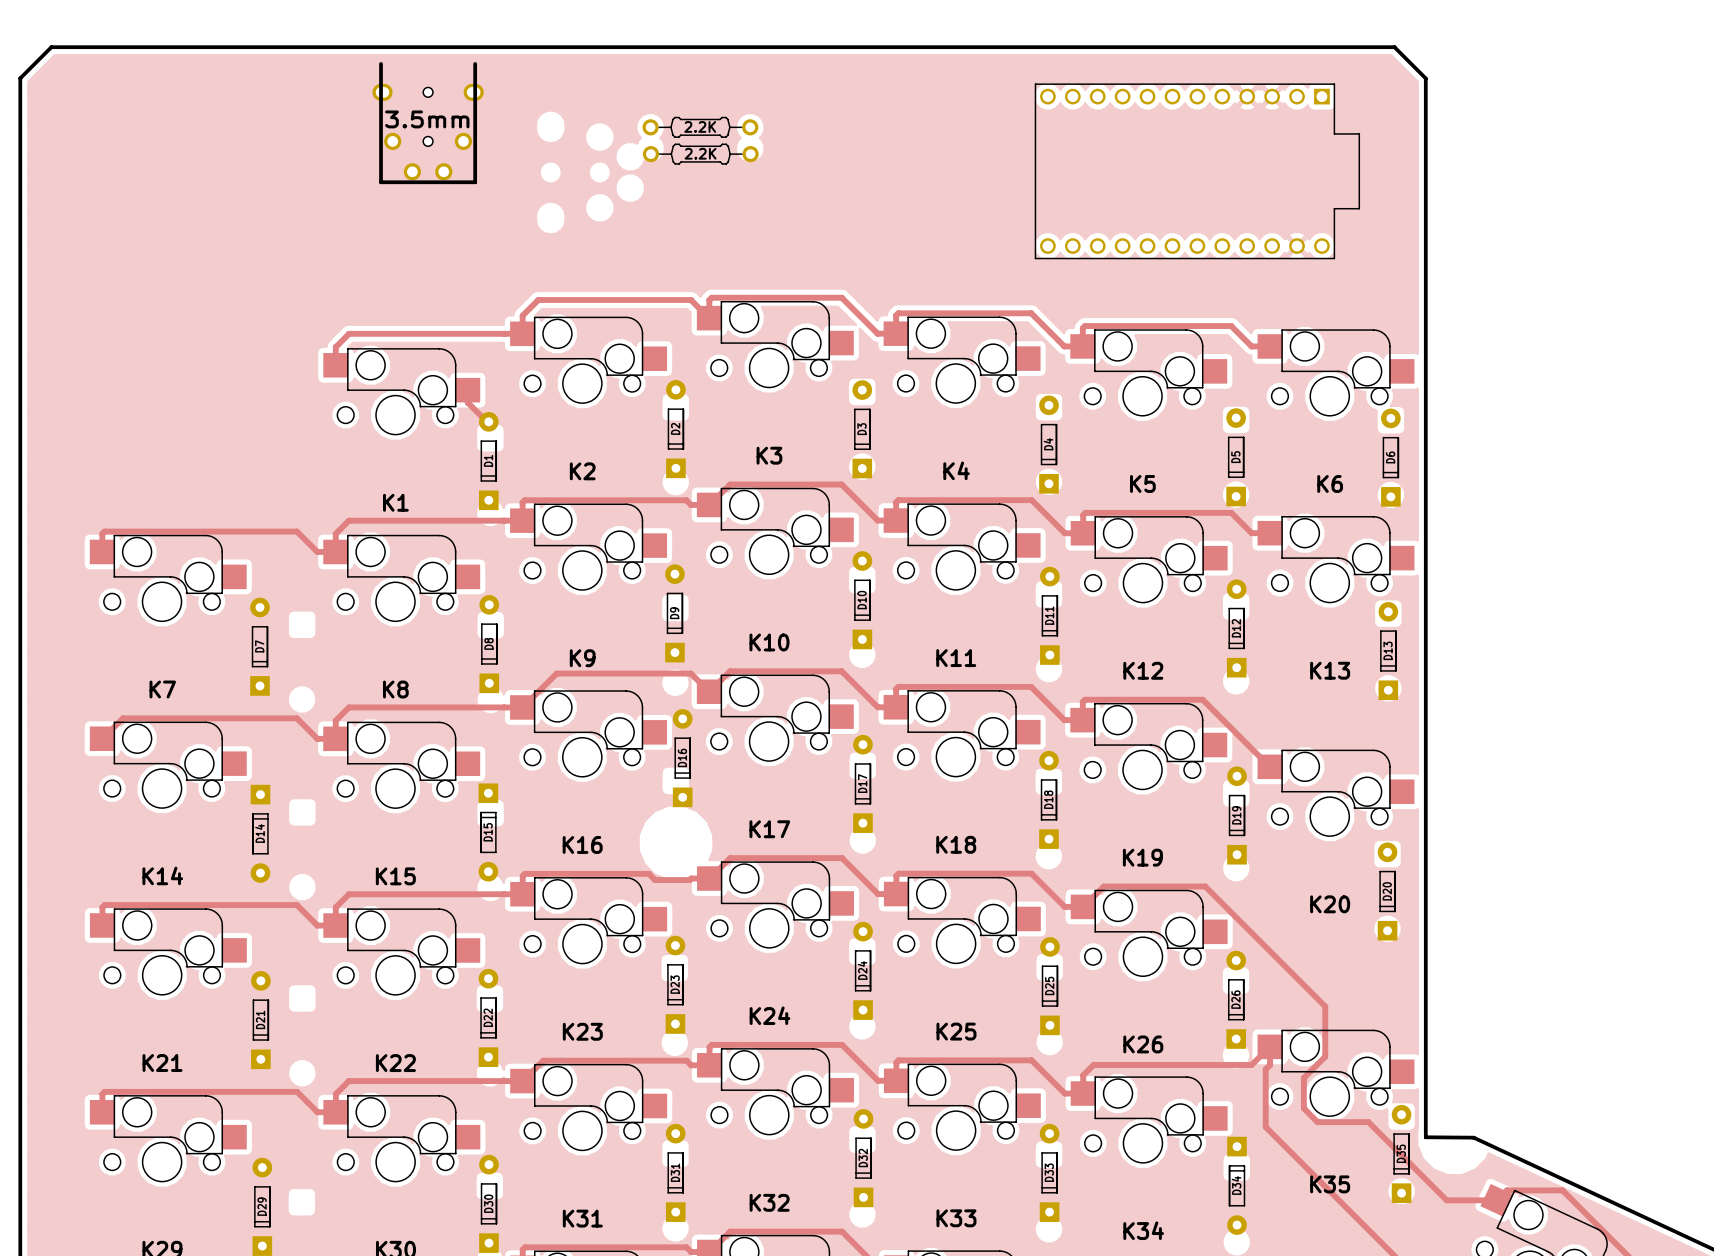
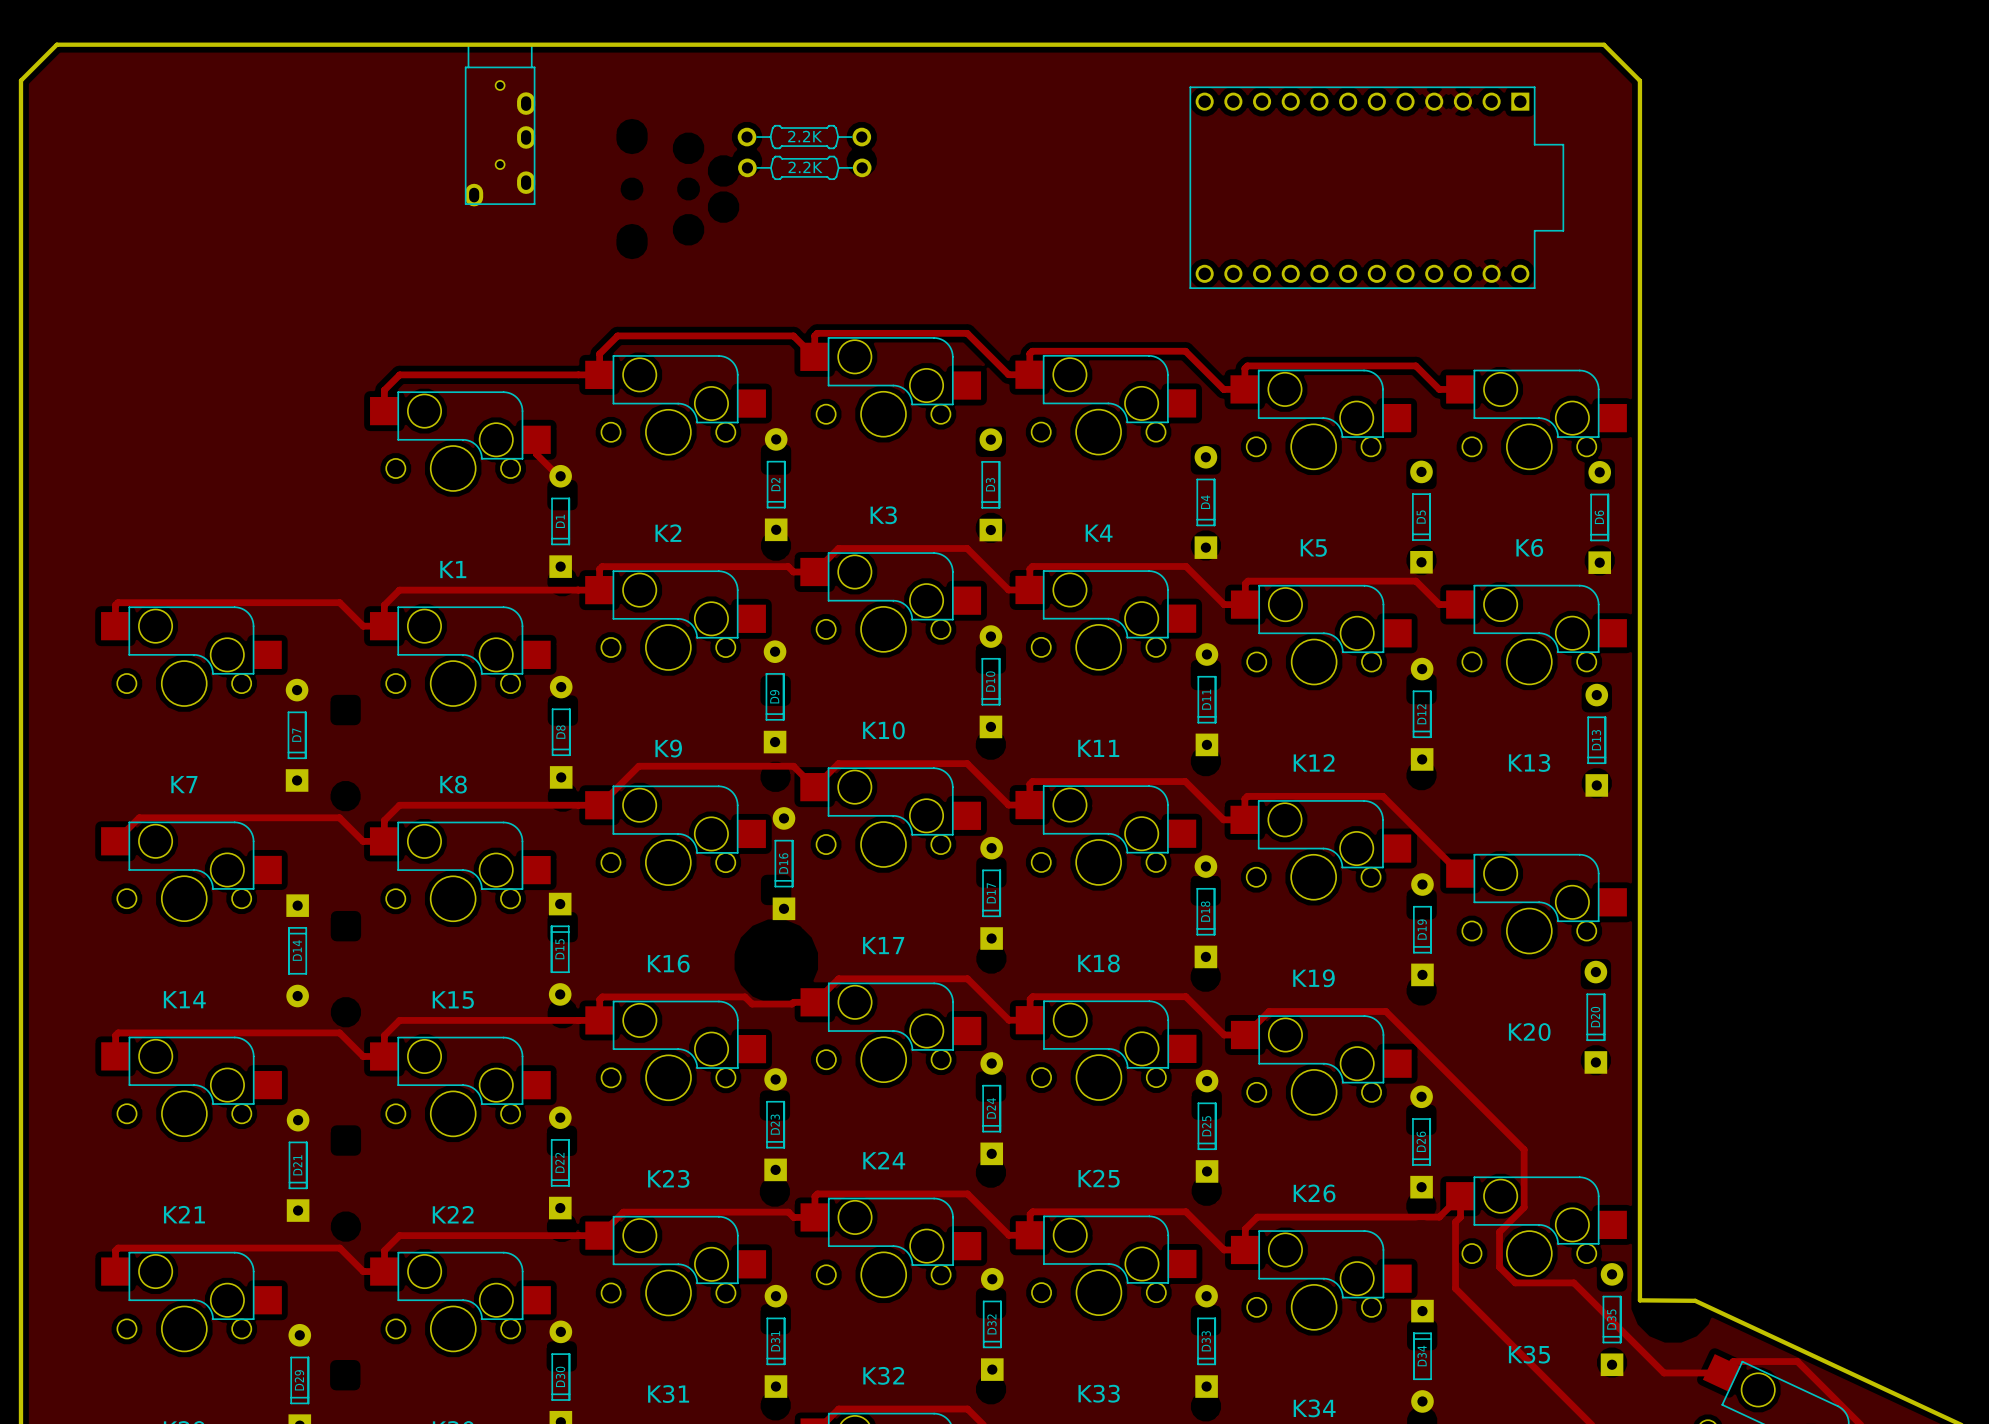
part: none -> (500, 125)
part: (428, 123) -> none

